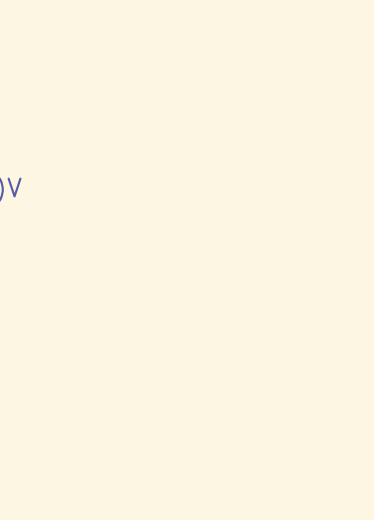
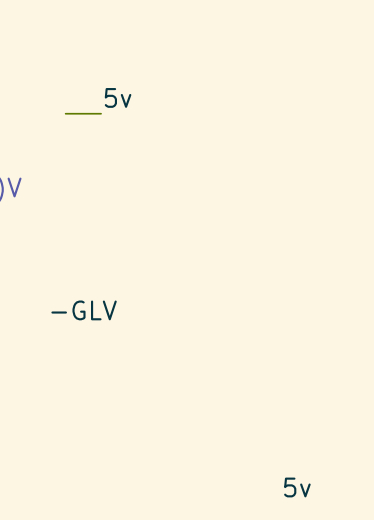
label: none -> 5v (118, 97)
wire: none -> (65, 113) (101, 113)
label: none -> -GLV (84, 310)
label: none -> 5v (297, 487)

